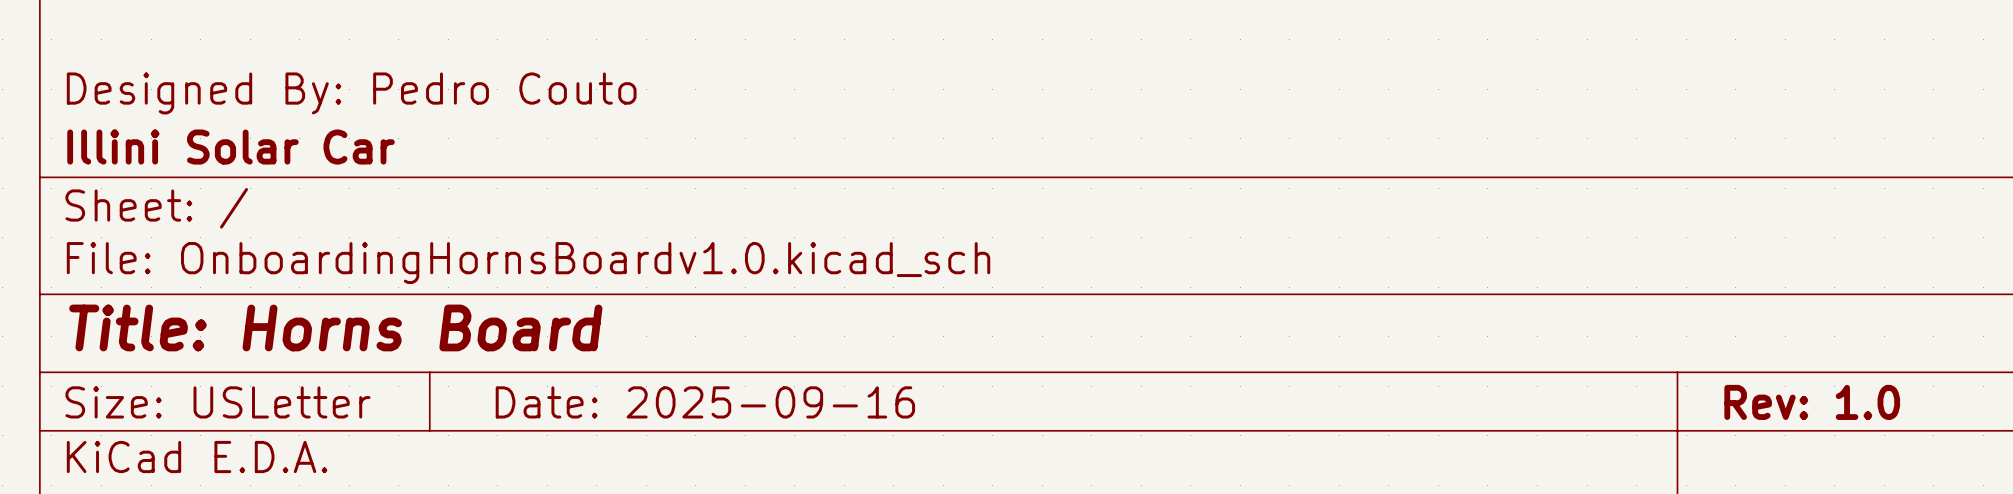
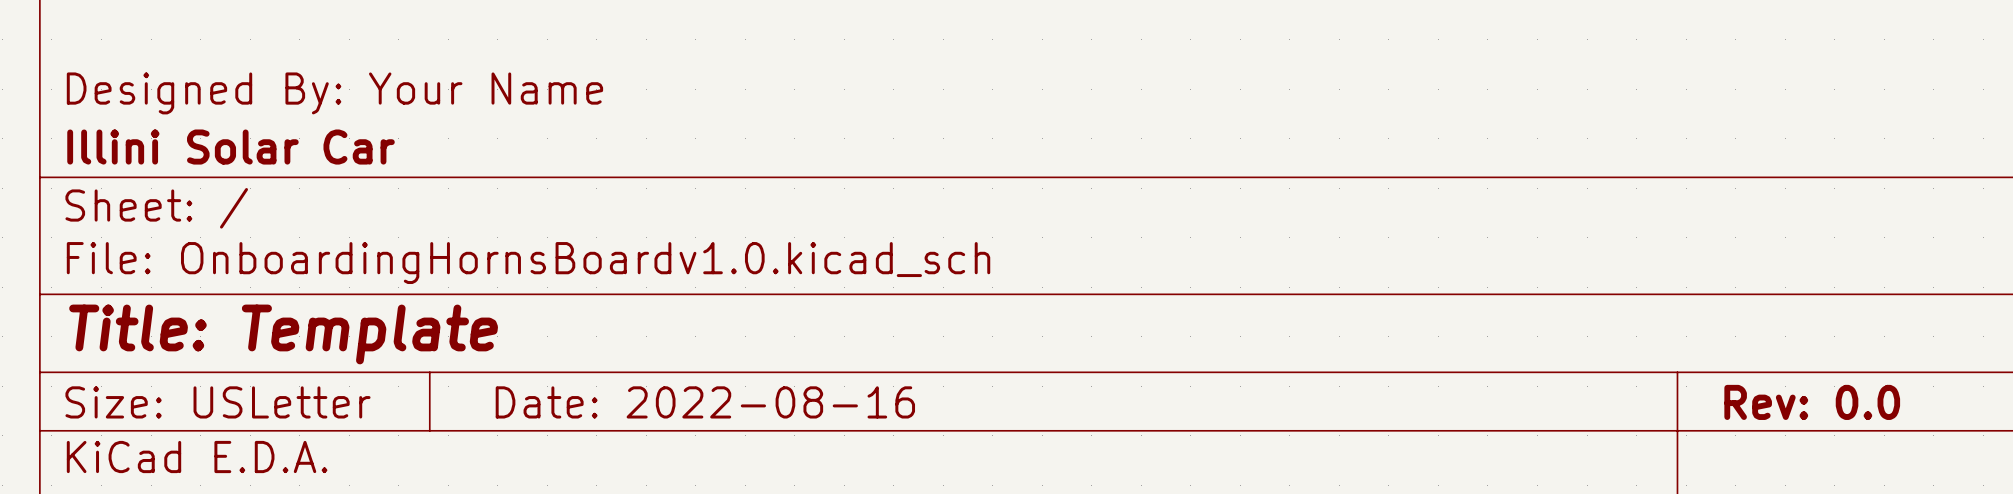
title block: Designed By: Pedro Couto (351, 93) -> Designed By: Your Name (334, 93)
title block: Title: Horns Board (335, 327) -> Title: Template (283, 334)
title block: Date: 2025-09-16 (705, 402) -> Date: 2022-08-16 (705, 402)
title block: Rev: 1.0 (1812, 402) -> Rev: 0.0 (1812, 402)

